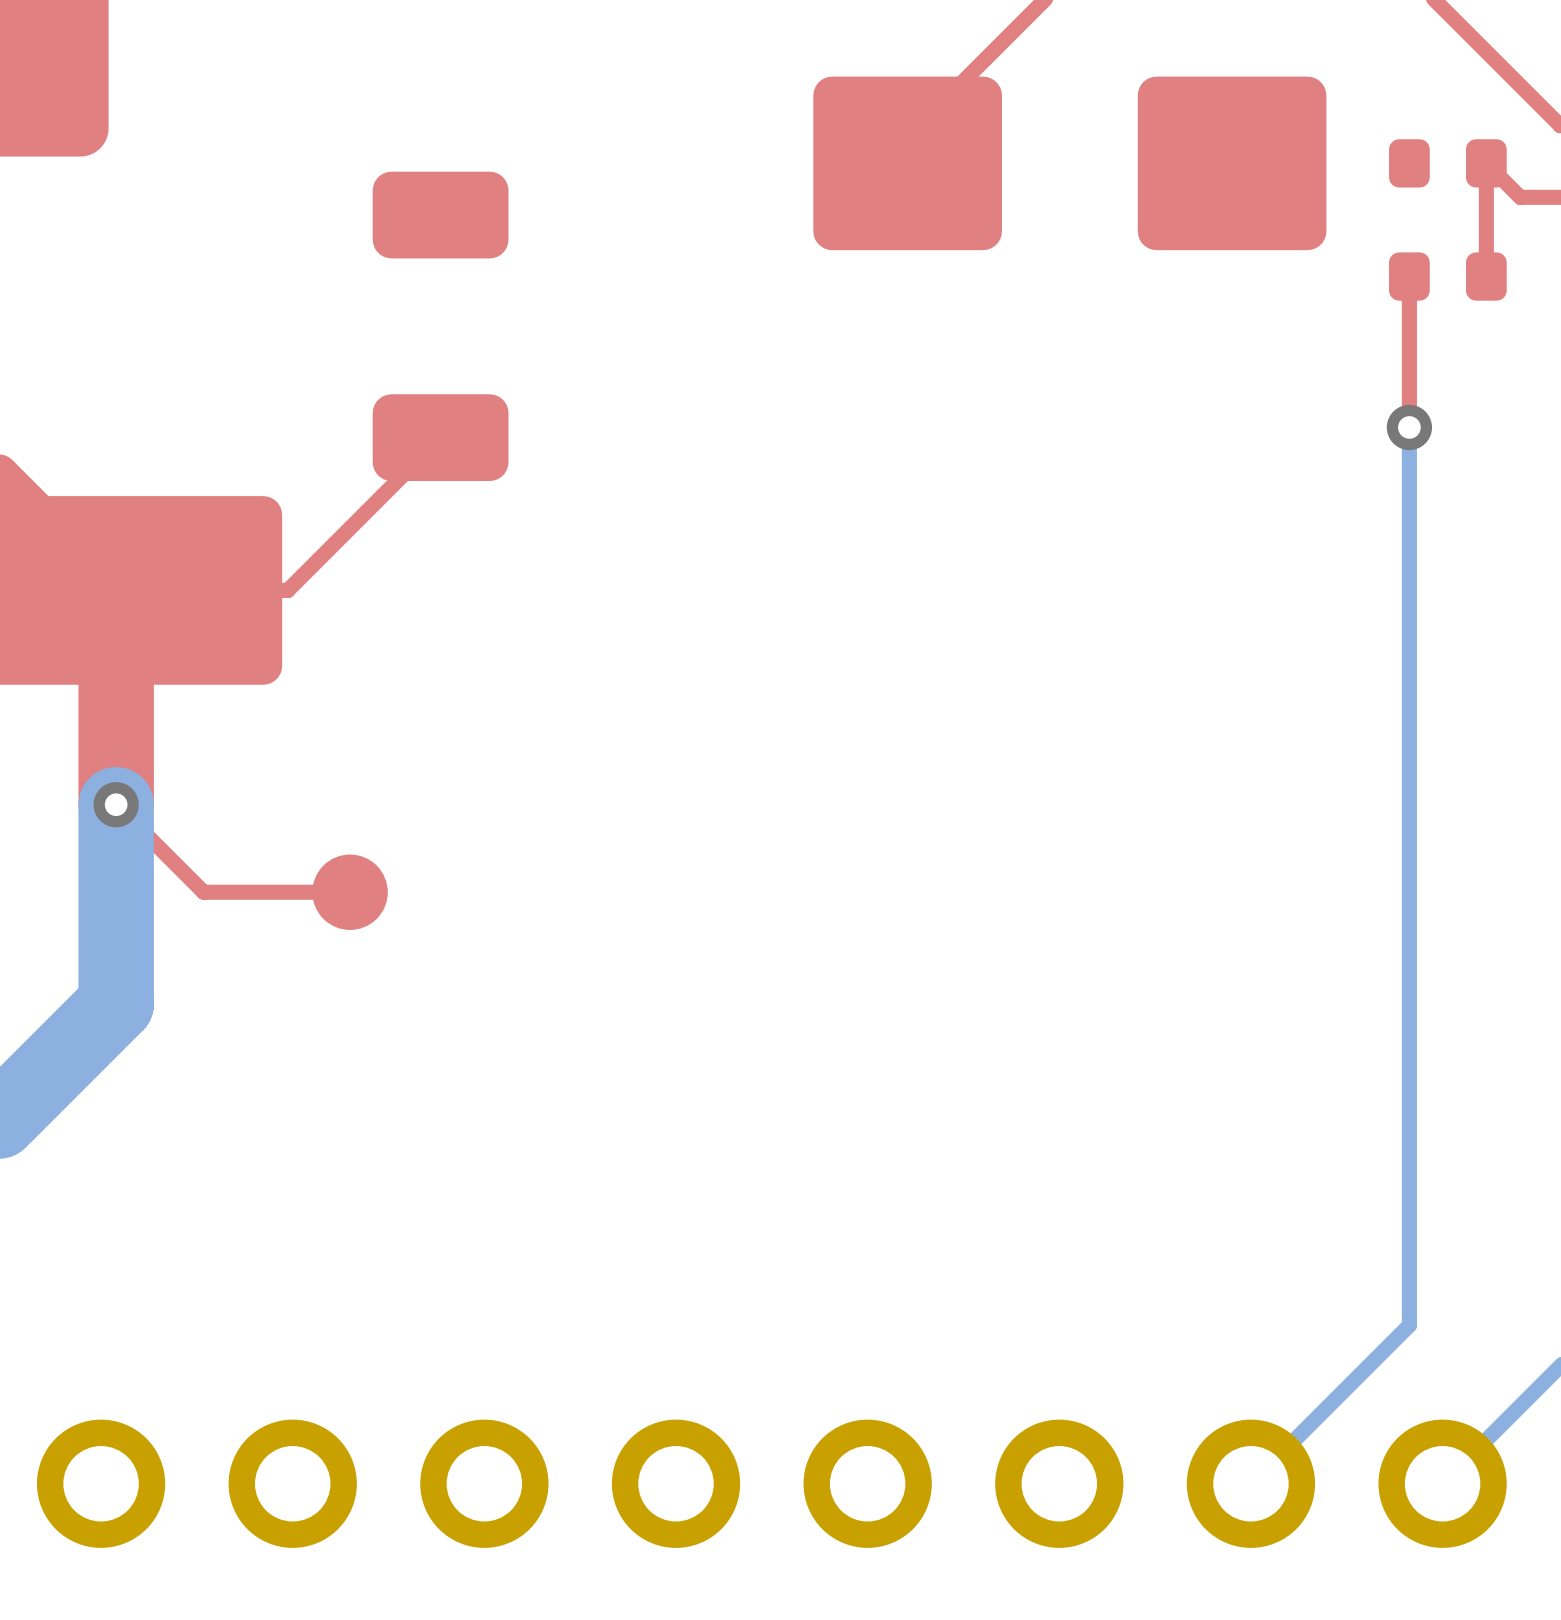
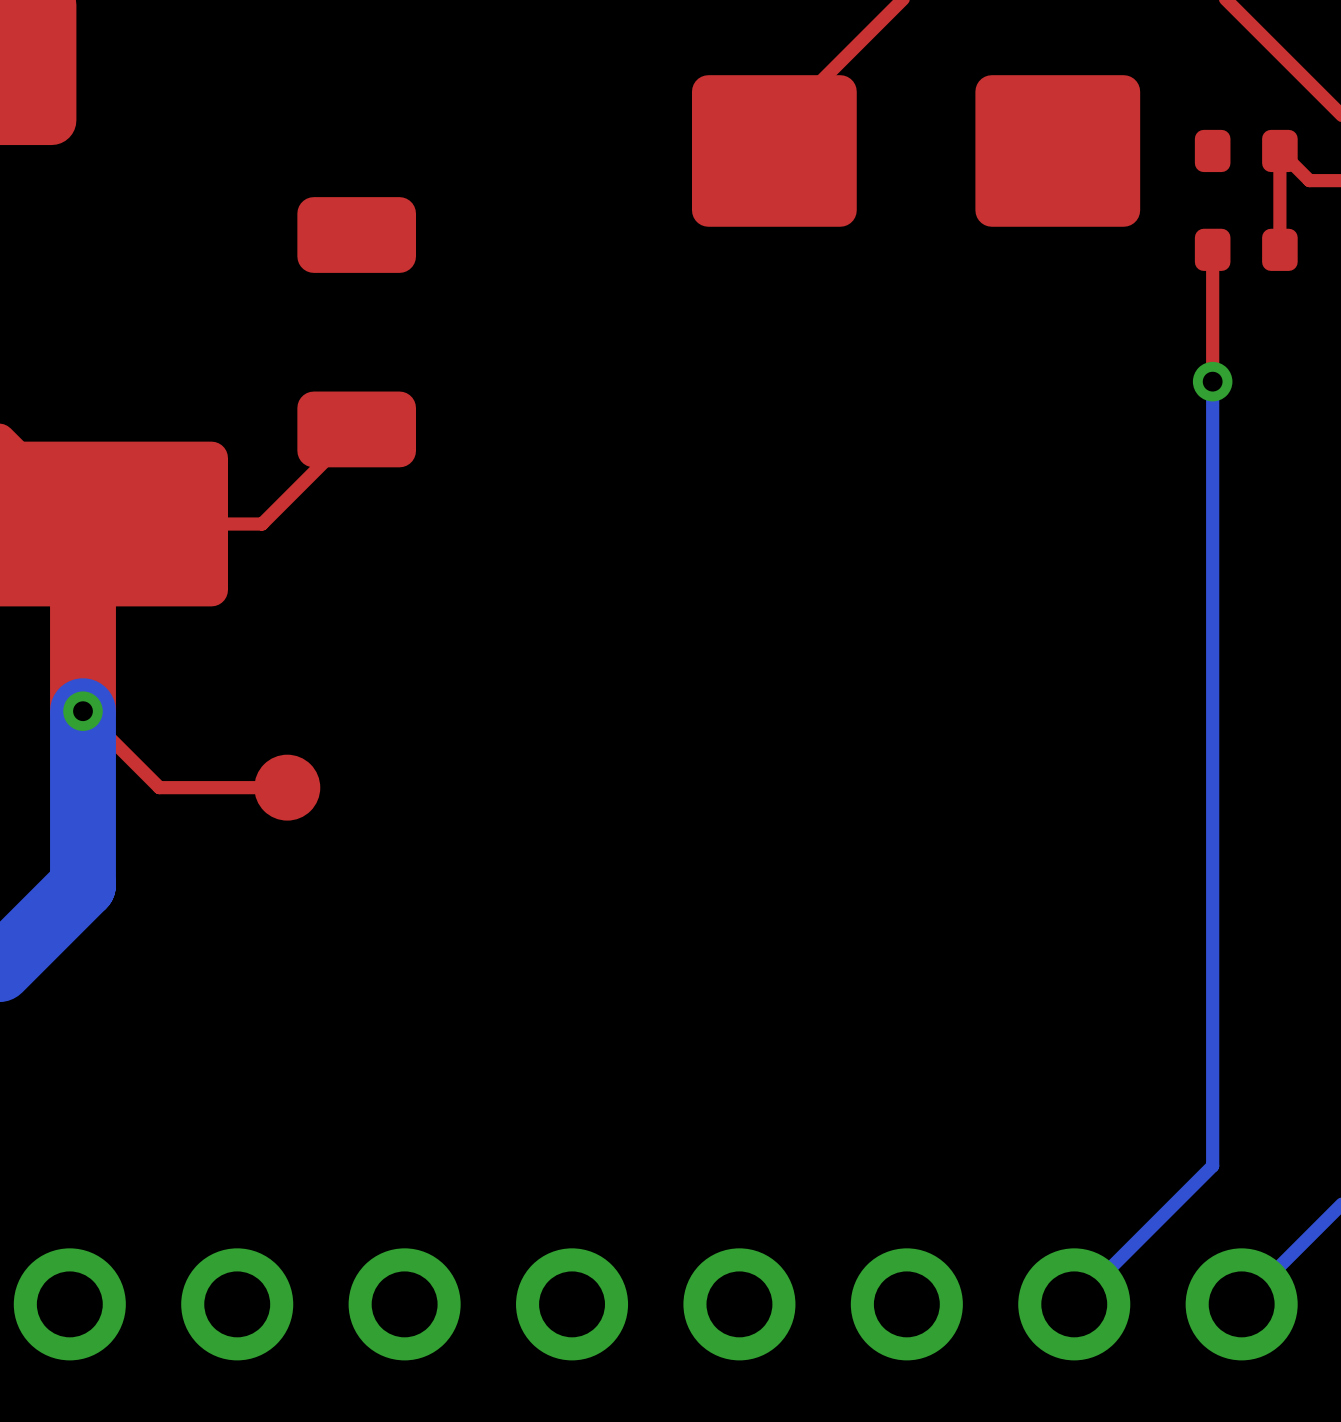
part position: (440, 326) -> (356, 332)
top track: (440, 437) (287, 590) -> (356, 429) (262, 524) (232, 524)

